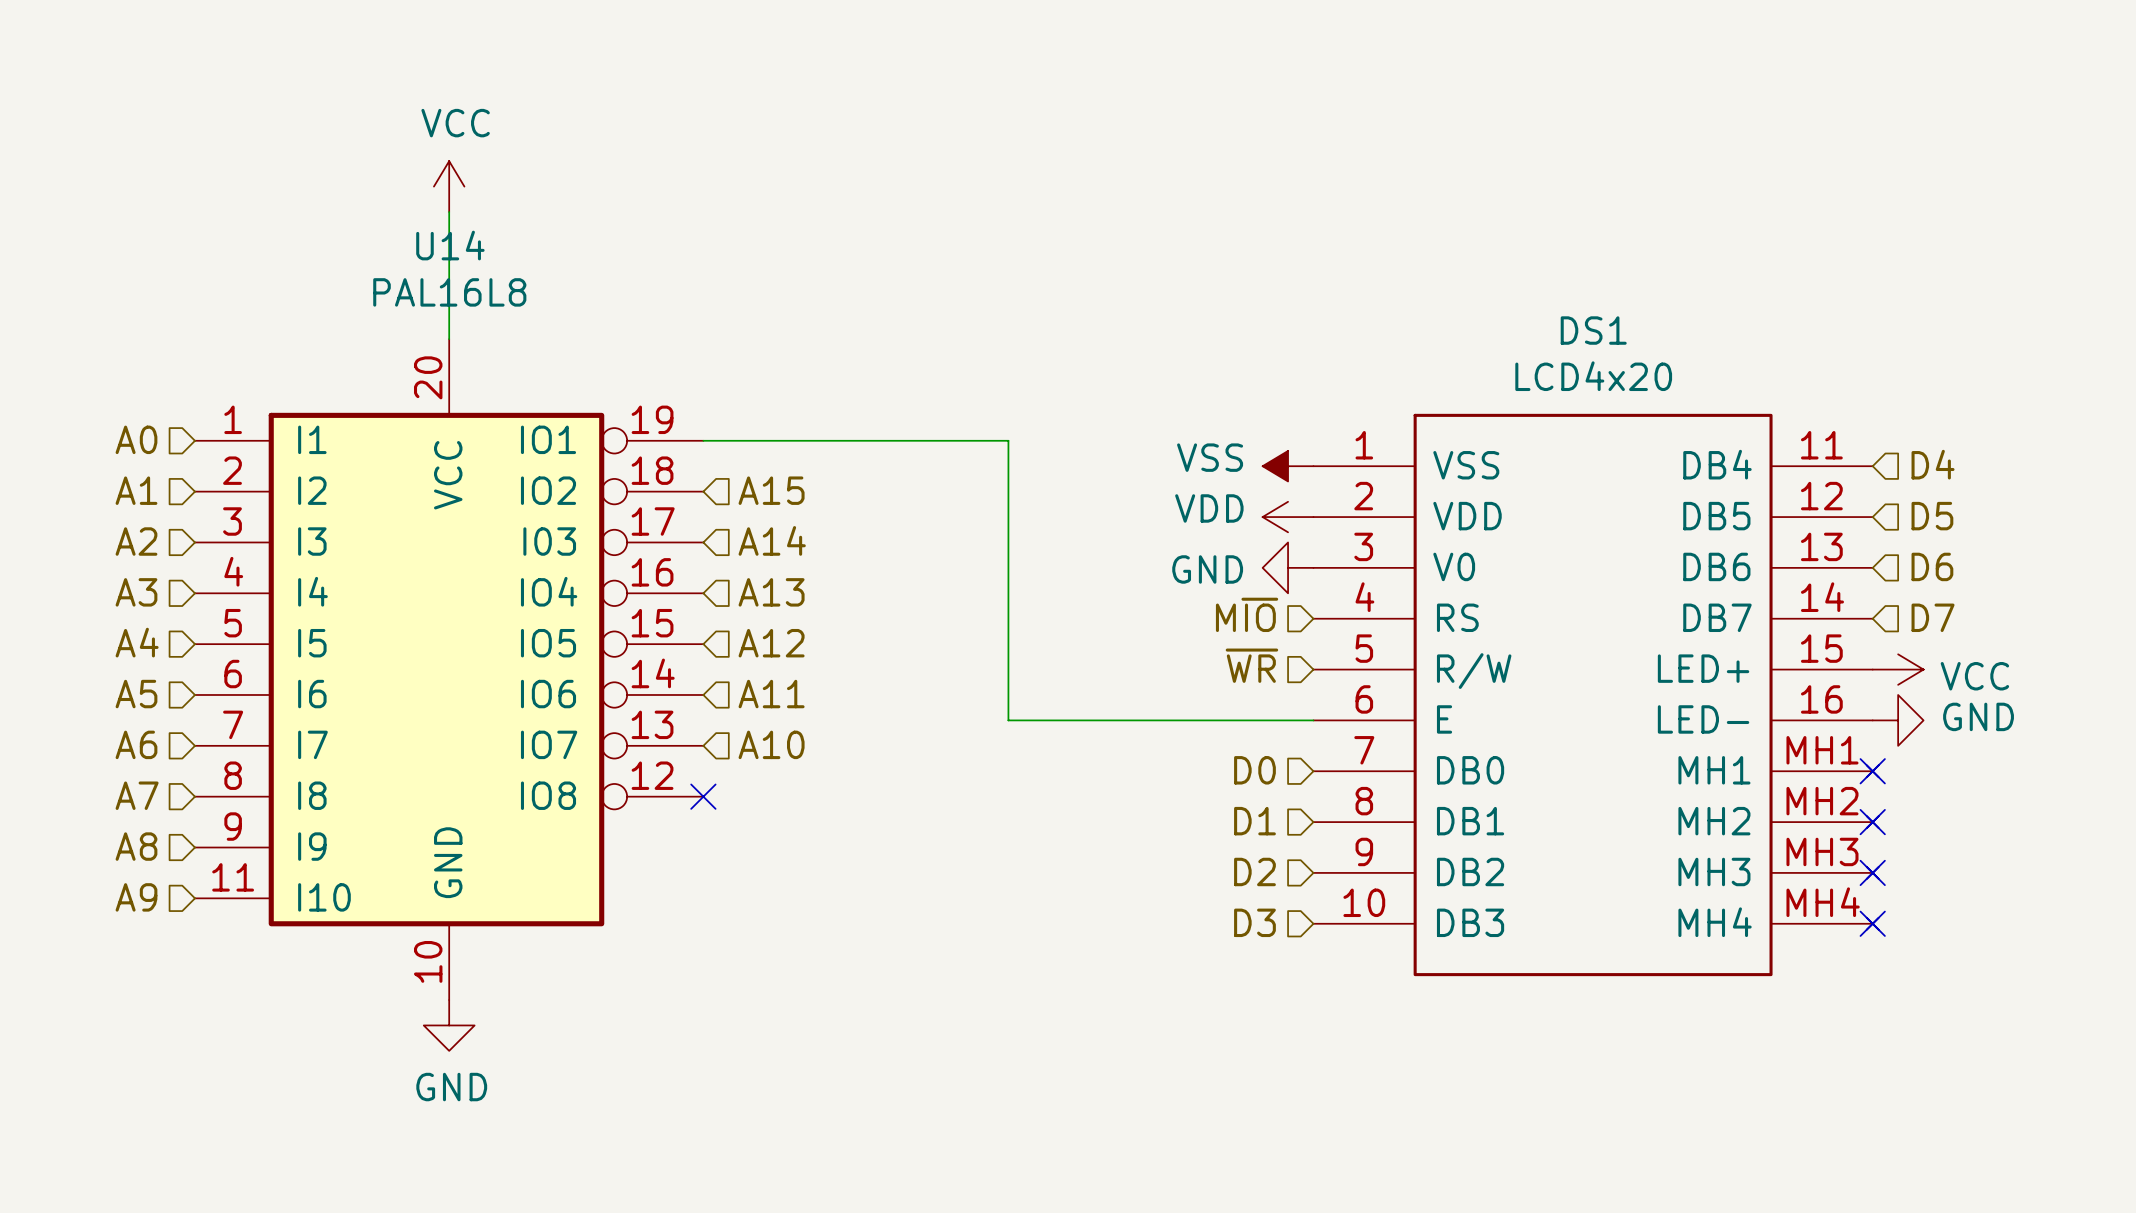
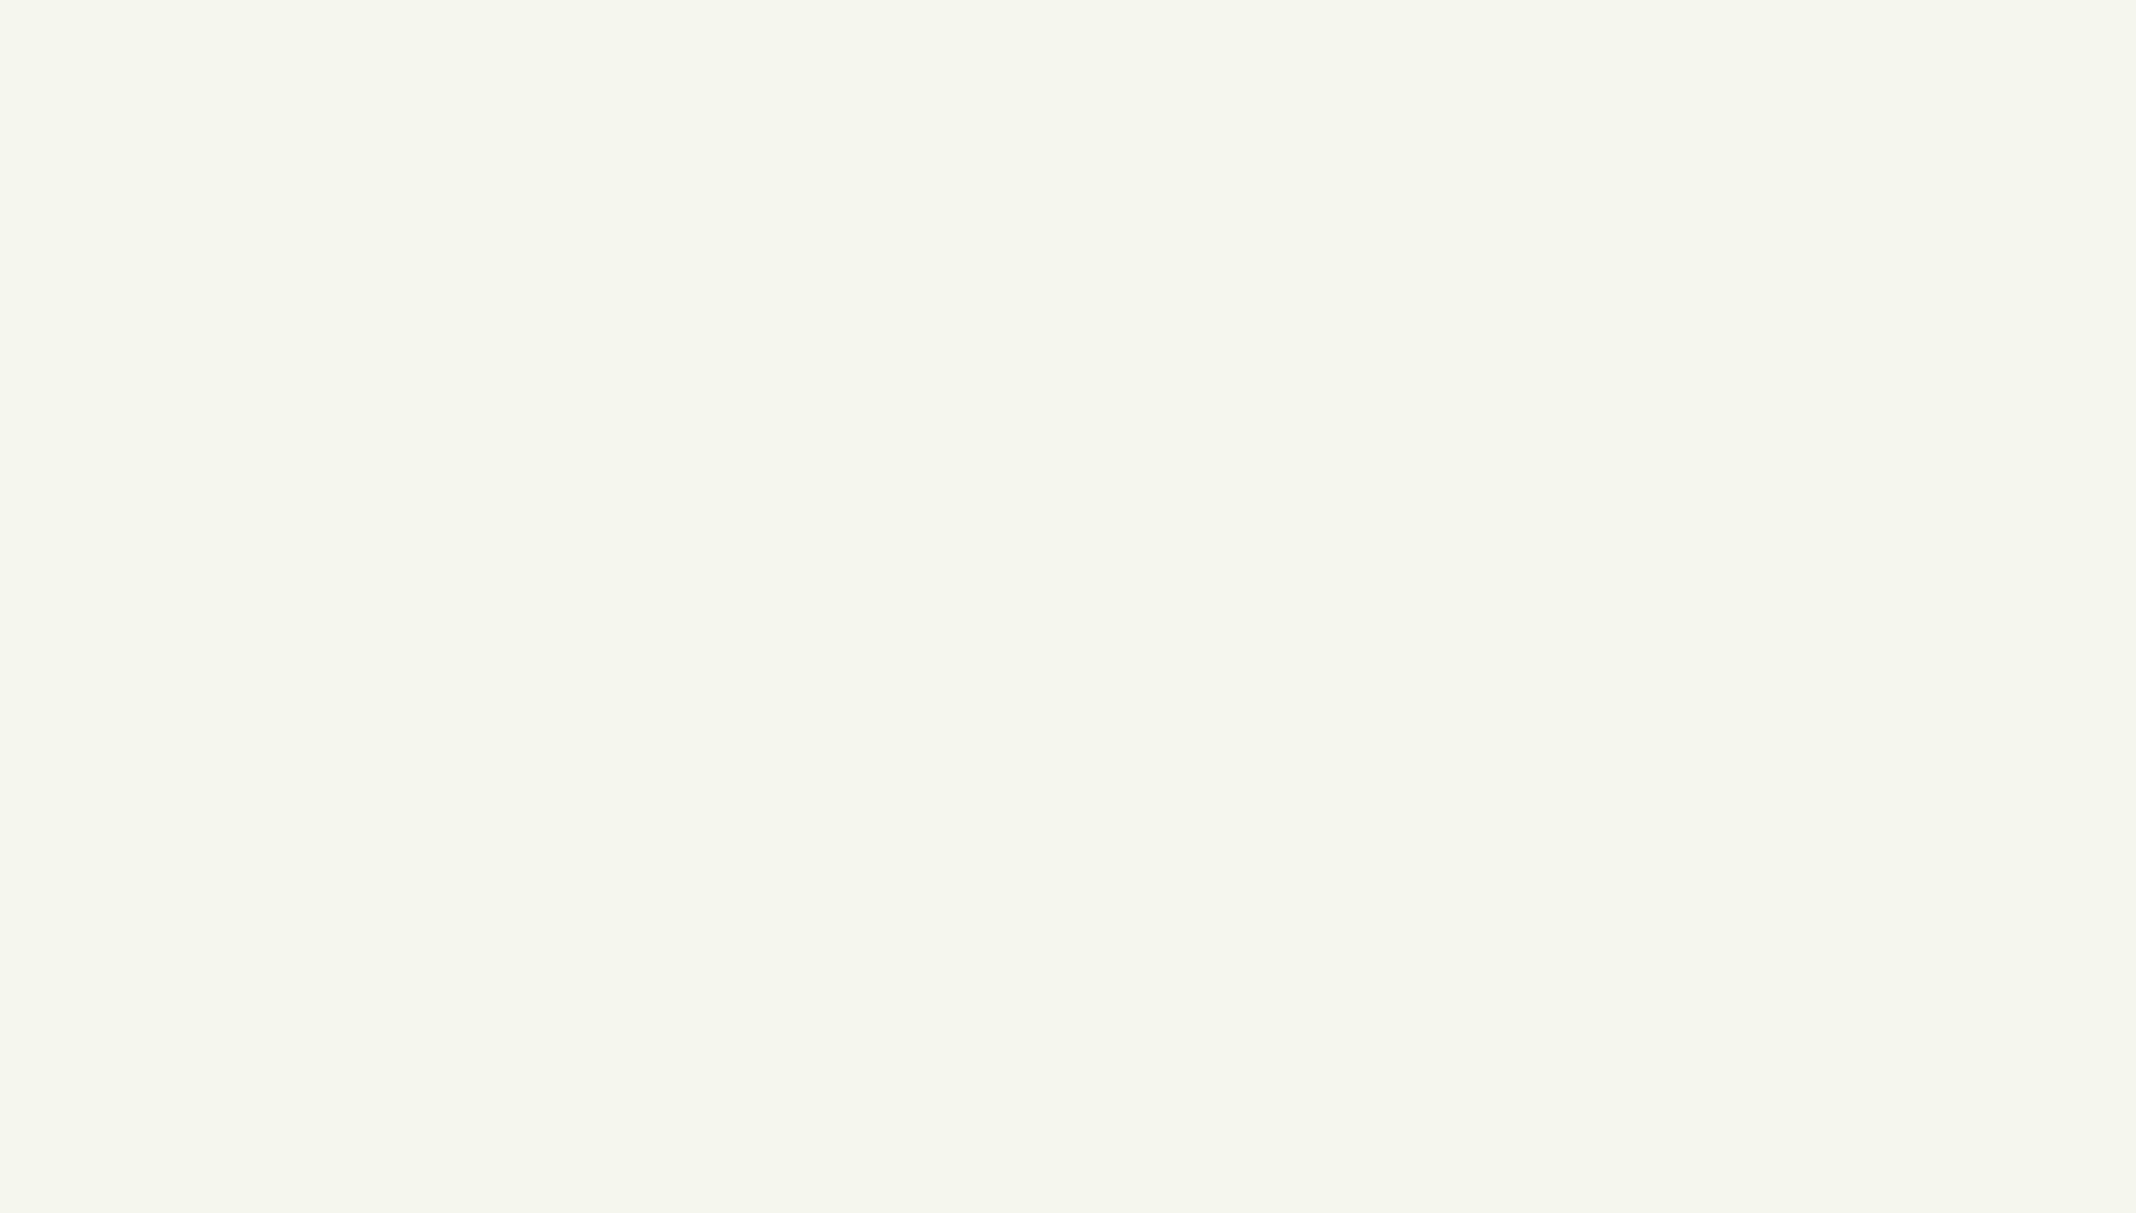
power symbol: VCC (449, 186) -> none
wire: (449, 212) (449, 339) -> none
hierarchical label: A0 (136, 439) -> none
wire: (703, 440) (1008, 440) (1008, 720) (1313, 720) -> none
hierarchical label: D4 (1933, 464) -> none
power symbol: VSS (1288, 466) -> none
hierarchical label: A1 (136, 490) -> none
hierarchical label: A15 (771, 490) -> none
hierarchical label: D5 (1932, 516) -> none
power symbol: VDD (1288, 517) -> none
hierarchical label: A14 (772, 540) -> none
hierarchical label: A2 (136, 541) -> none
hierarchical label: D6 (1932, 566) -> none
power symbol: GND (1288, 567) -> none
hierarchical label: A3 (136, 592) -> none
hierarchical label: A13 (771, 592) -> none
hierarchical label: M~{IO} (1247, 614) -> none
hierarchical label: D7 (1933, 617) -> none
hierarchical label: A4 (137, 642) -> none
hierarchical label: A12 (771, 643) -> none
hierarchical label: ~{WR} (1251, 665) -> none
U14: PAL16L8 (449, 669) -> none
power symbol: VCC (1898, 669) -> none
hierarchical label: A5 (136, 694) -> none
hierarchical label: A11 (771, 694) -> none
DS1: LCD4x20 (1596, 694) -> none
power symbol: GND (1898, 720) -> none
hierarchical label: A6 (136, 744) -> none
hierarchical label: A10 (771, 744) -> none
hierarchical label: D0 (1254, 770) -> none
no-connect mark: (1872, 771) -> none
hierarchical label: A7 (137, 795) -> none
no-connect mark: (703, 796) -> none
hierarchical label: D1 (1254, 821) -> none
no-connect mark: (1872, 822) -> none
hierarchical label: A8 (136, 846) -> none
hierarchical label: D2 (1254, 871) -> none
no-connect mark: (1872, 872) -> none
hierarchical label: A9 (136, 897) -> none
hierarchical label: D3 (1254, 922) -> none
no-connect mark: (1872, 923) -> none
power symbol: GND (449, 1025) -> none

